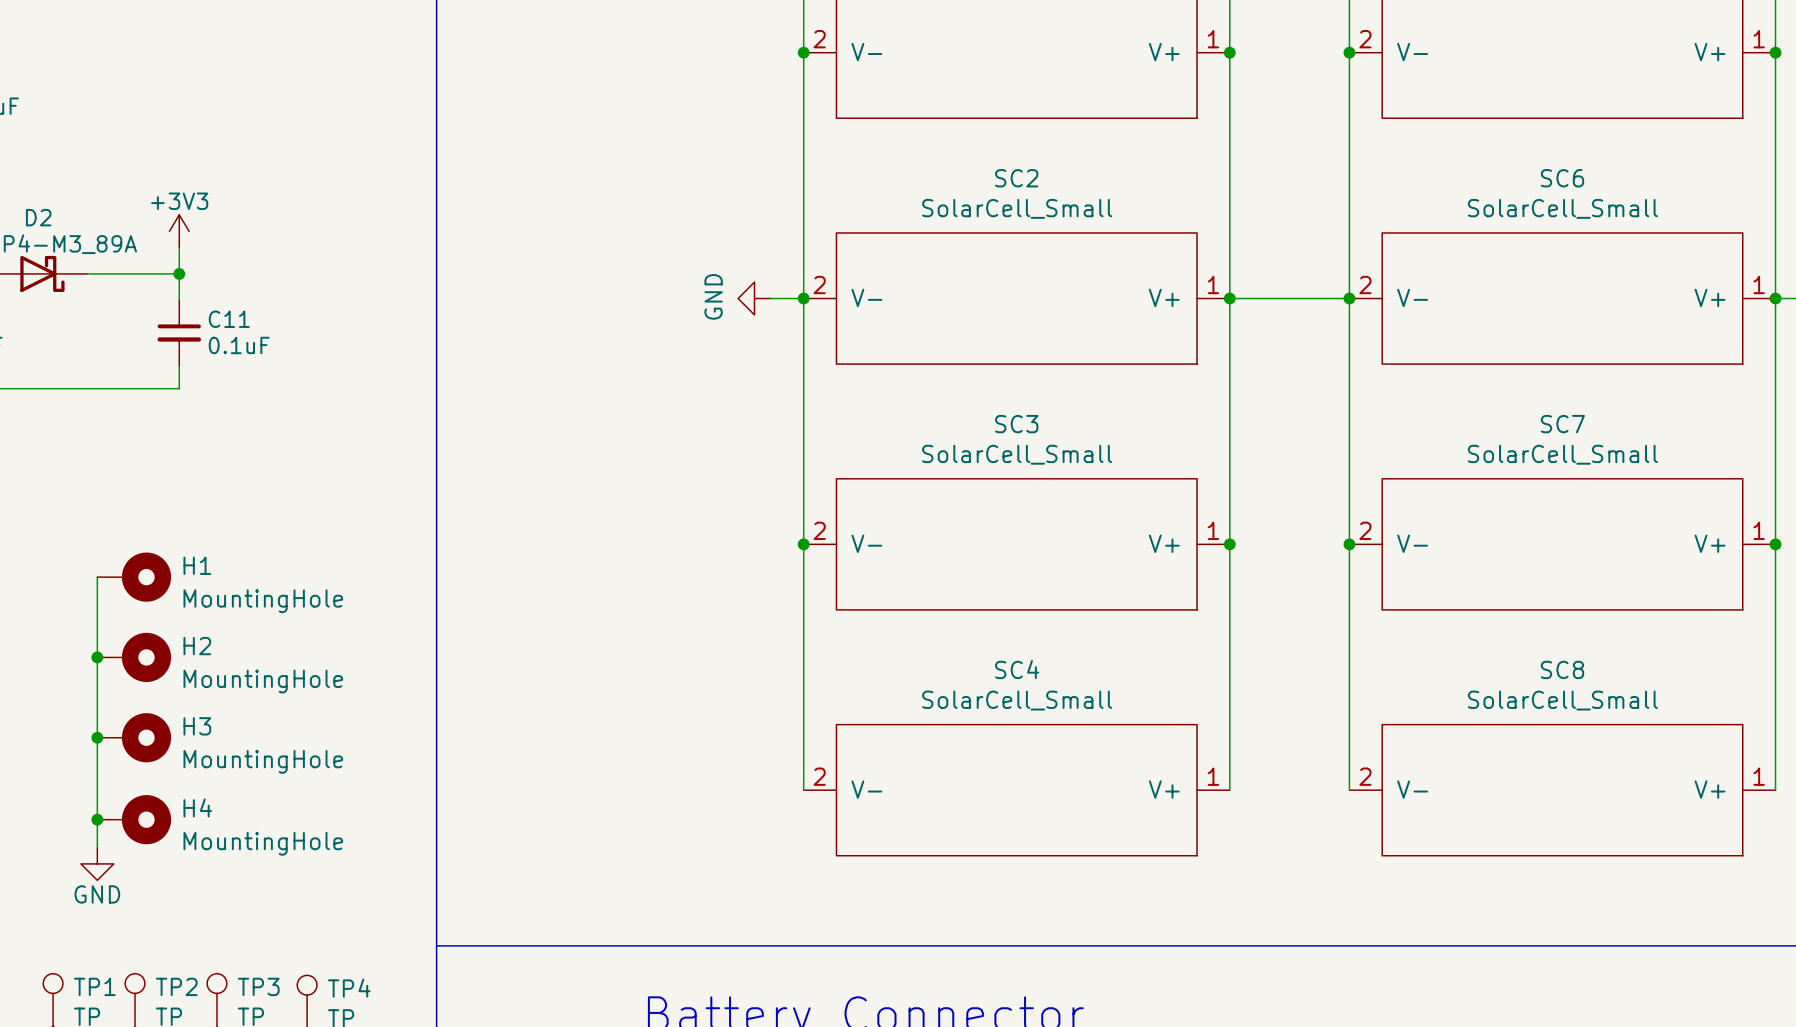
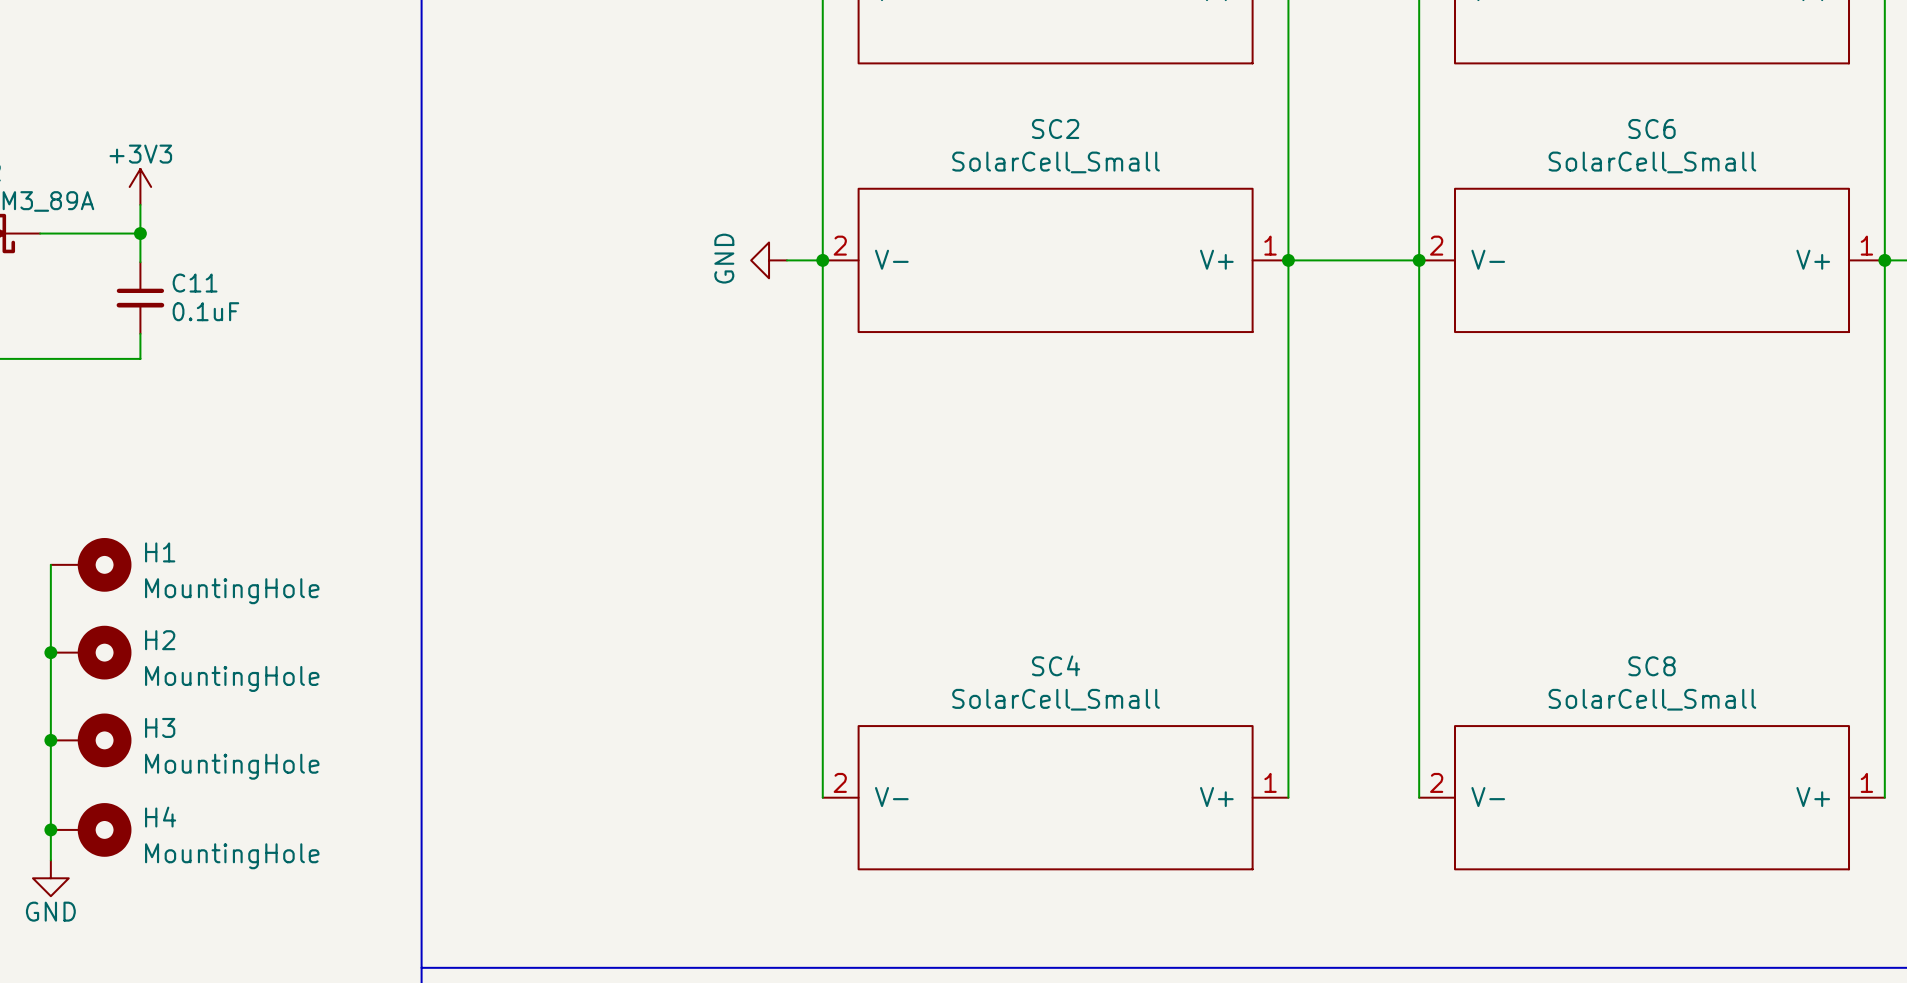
junction: (803, 544) -> none
SC3: SolarCell_Small (1016, 544) -> none
junction: (1229, 544) -> none
junction: (1349, 544) -> none
SC7: SolarCell_Small (1562, 544) -> none
junction: (1775, 544) -> none

